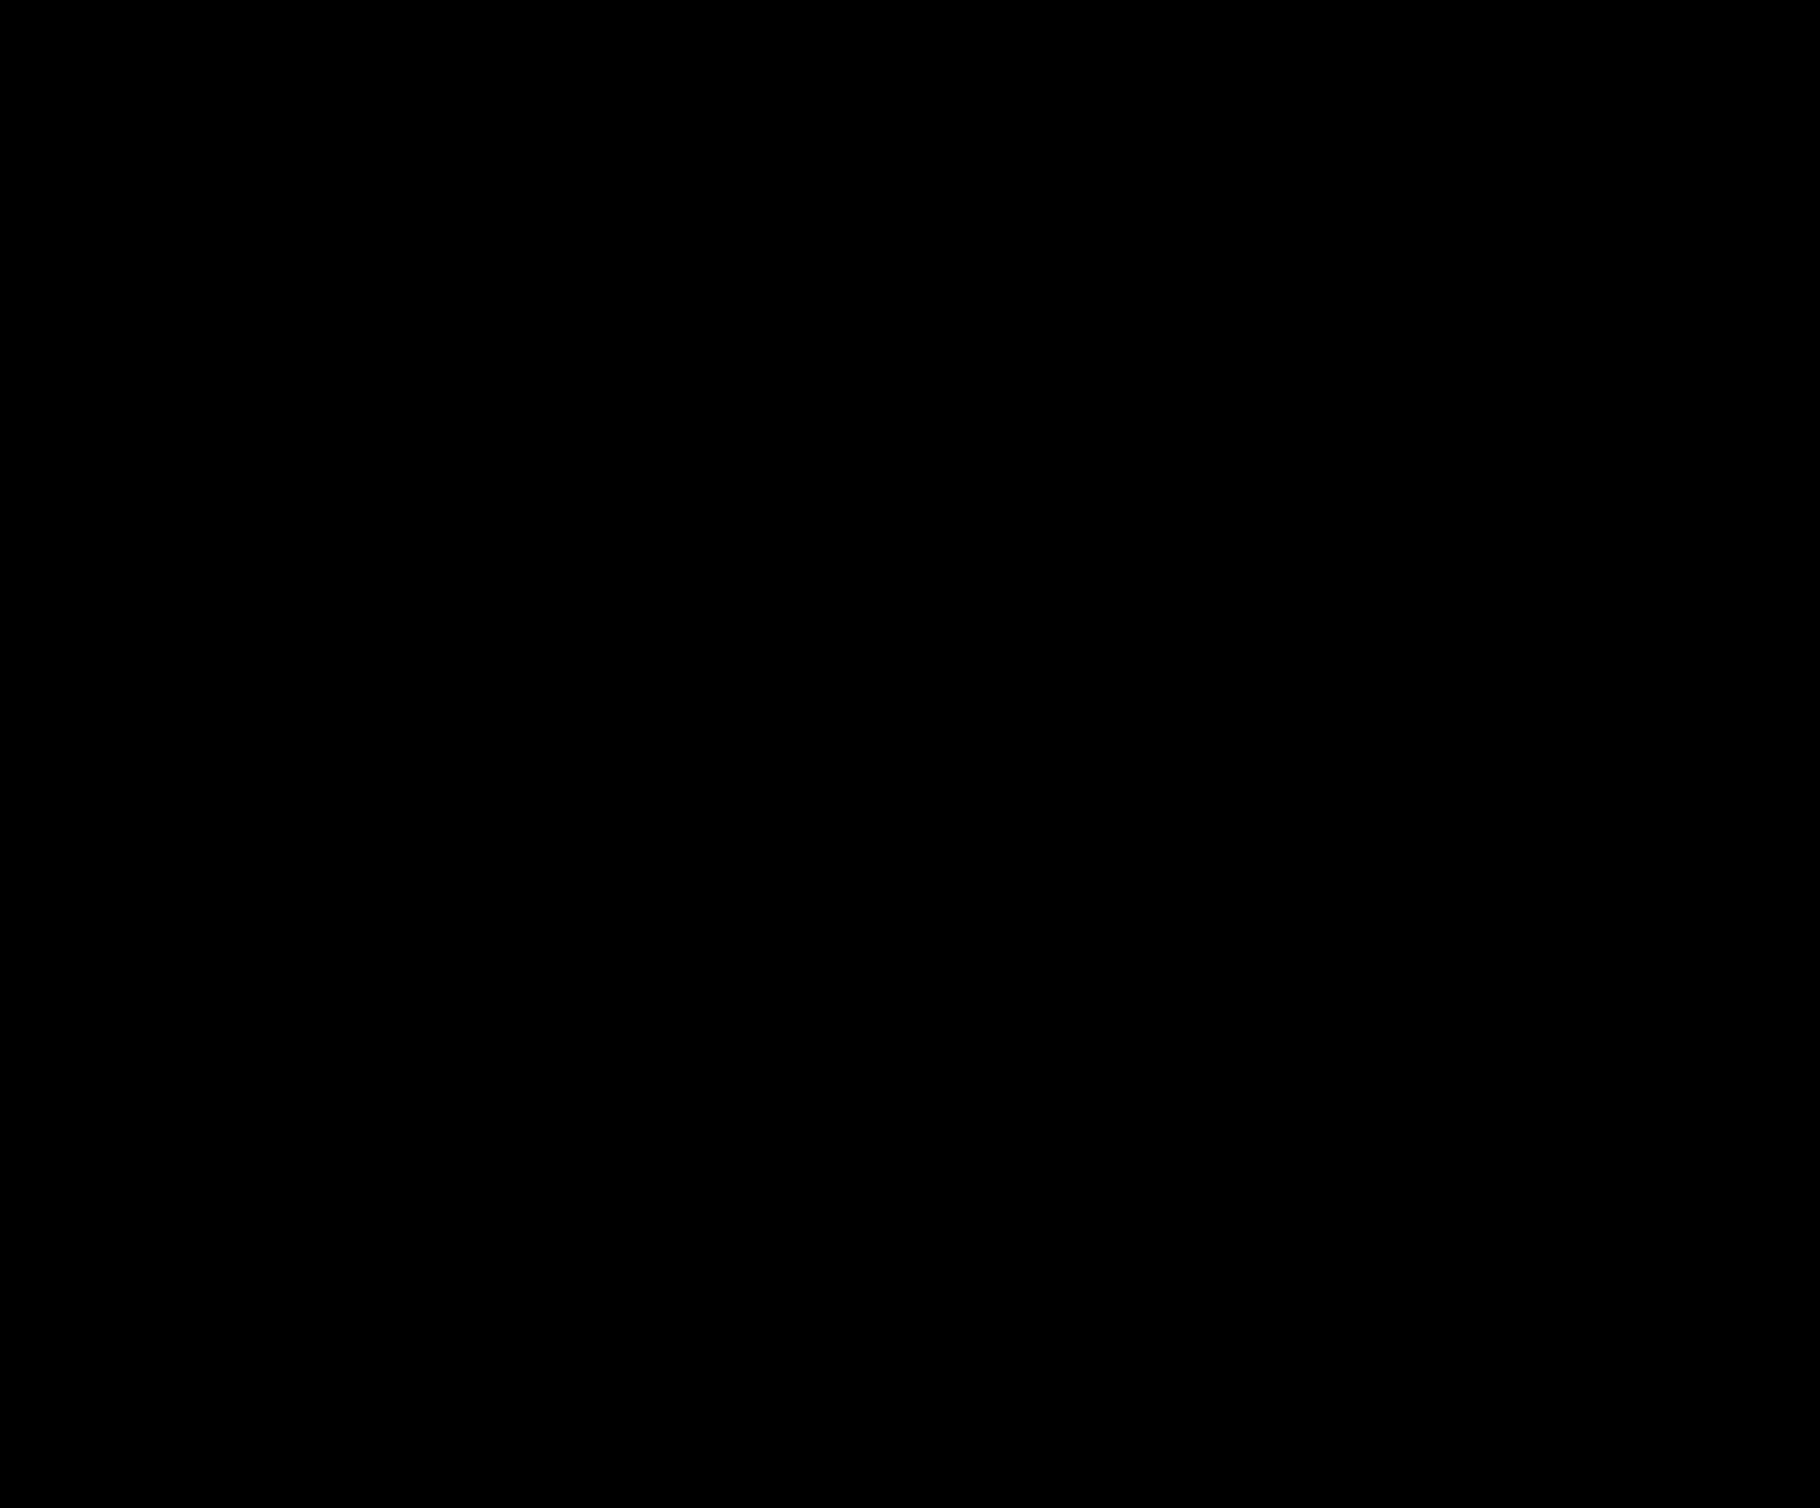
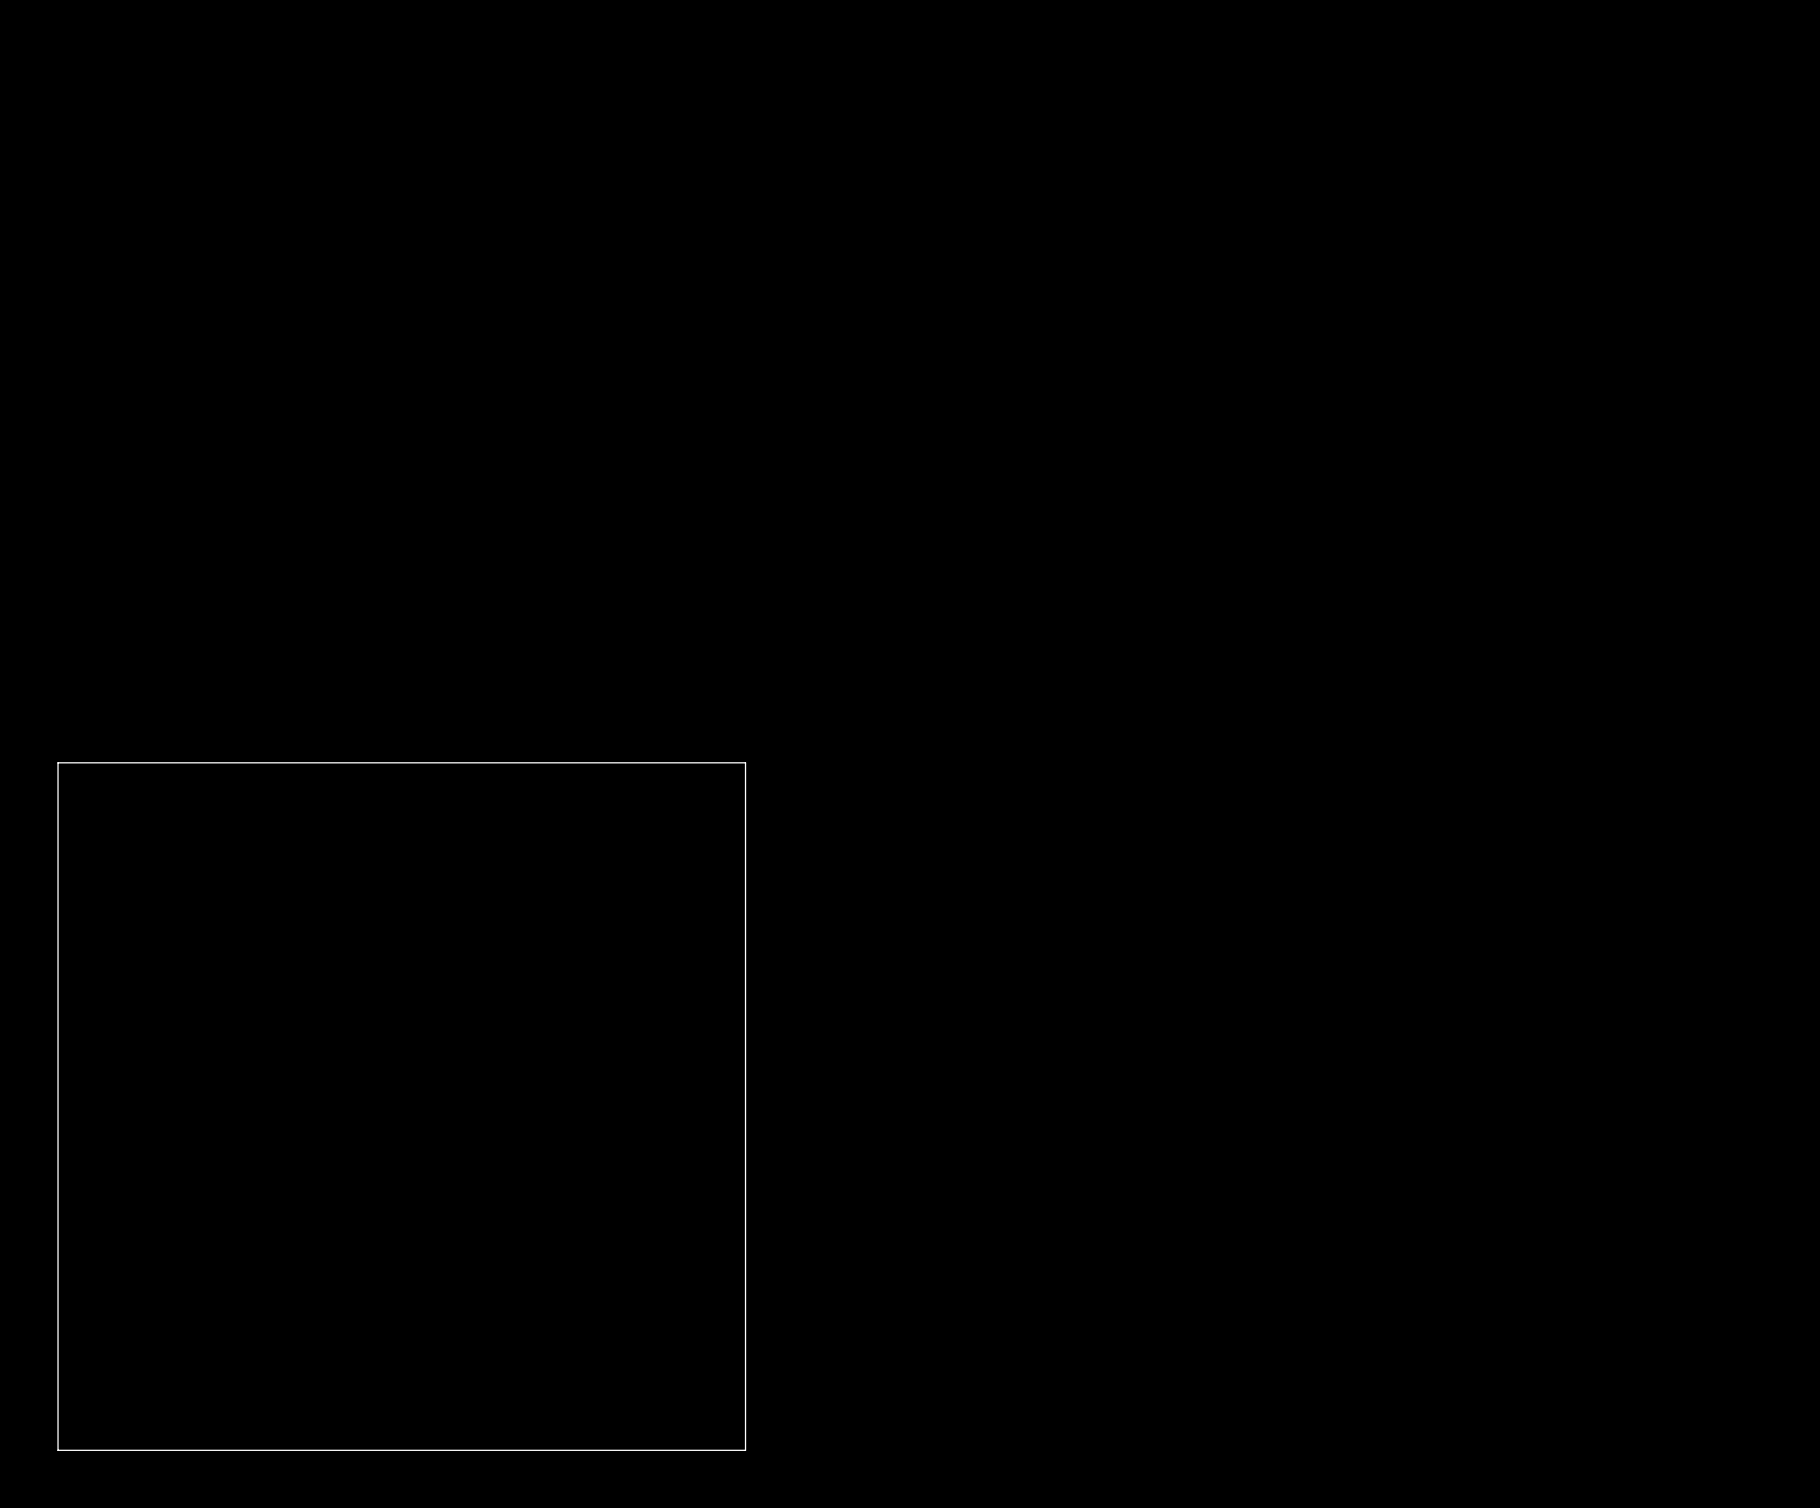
board edge: none -> (745, 762) (58, 762) (58, 1450) (745, 1450) (745, 762)

